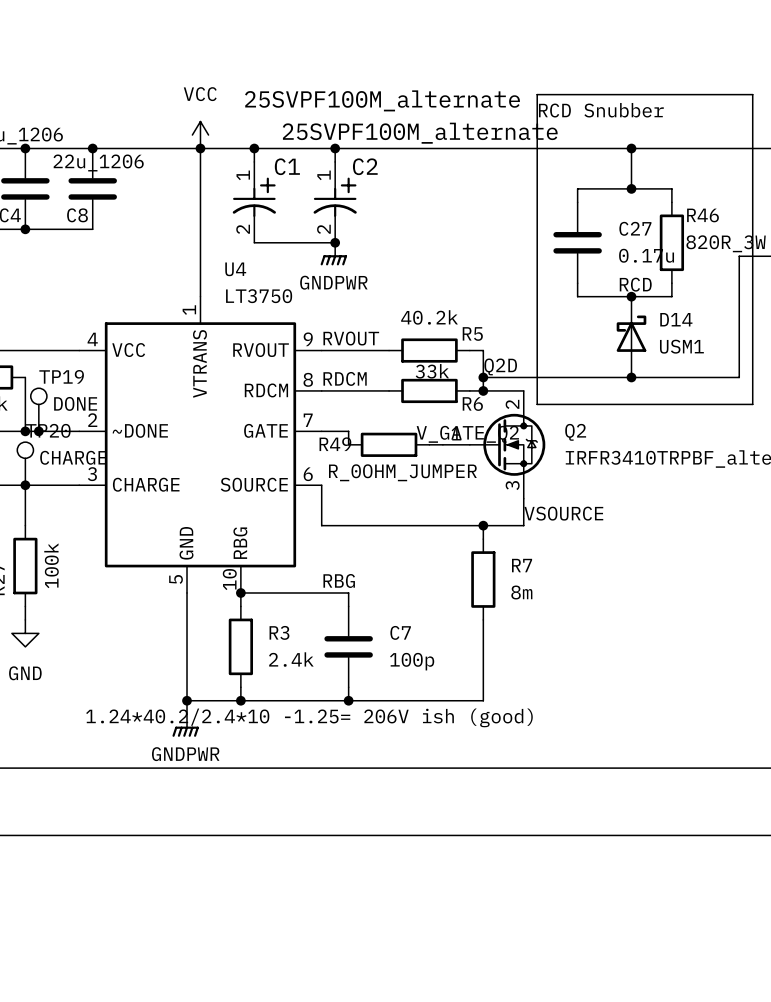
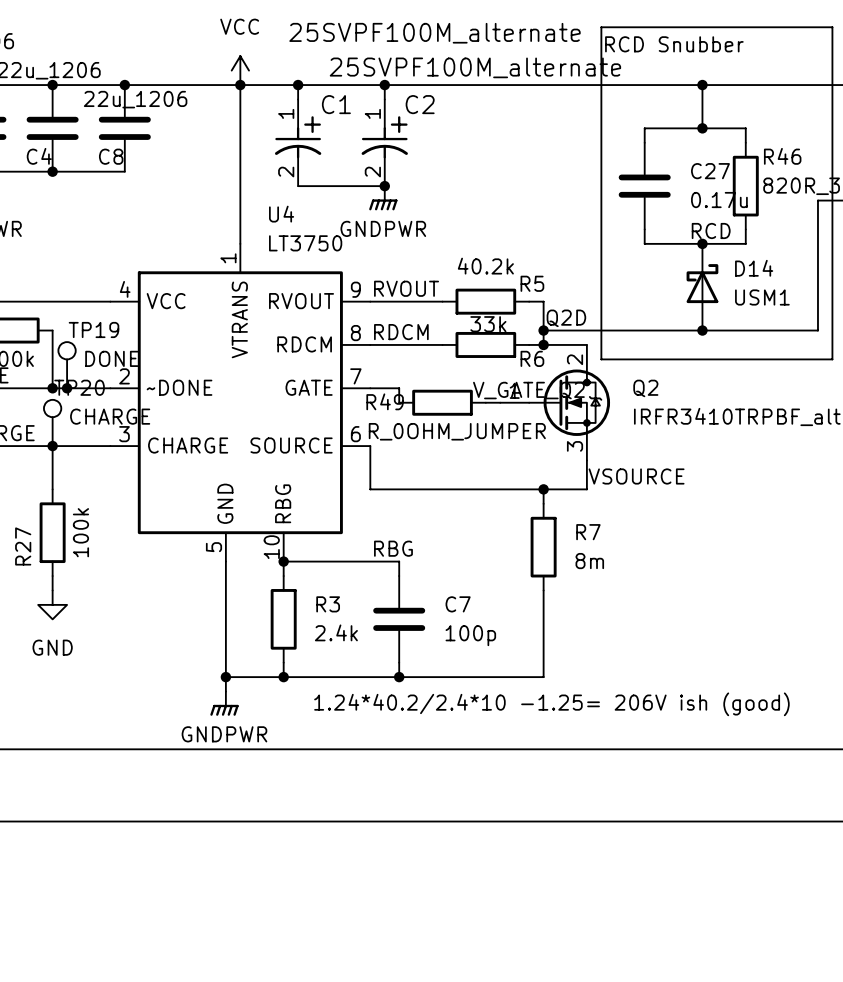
text position: 1.24*40.2/2.4*10 -1.25= 206V ish (good) (309, 717) -> 1.24*40.2/2.4*10 -1.25= 206V ish (good) (551, 704)

